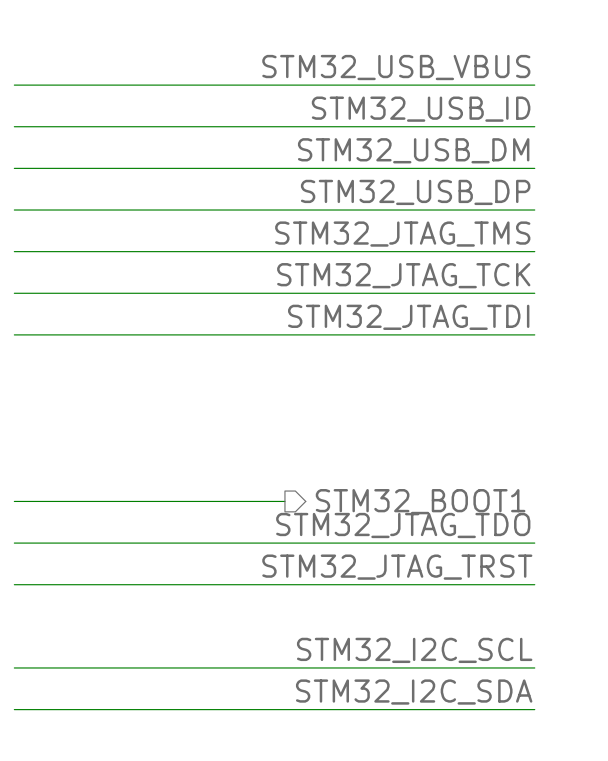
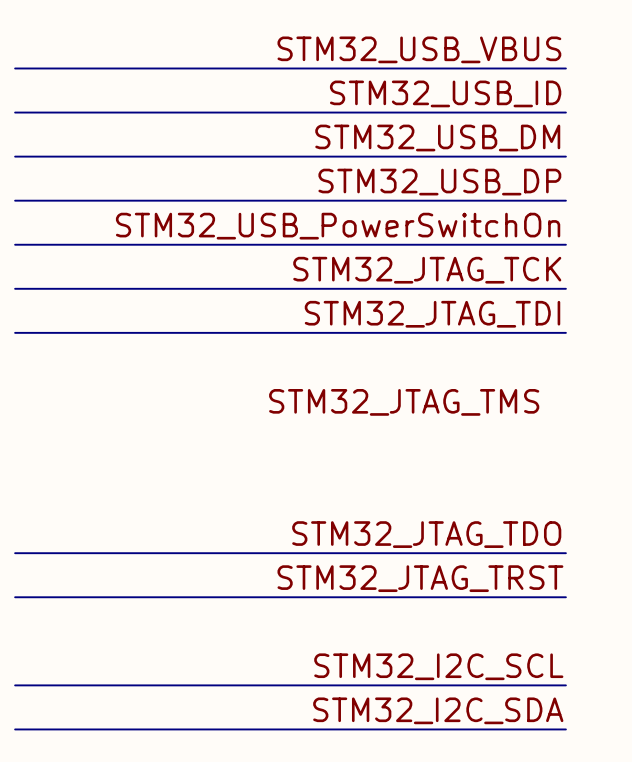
label: STM32_JTAG_TMS (402, 234) -> STM32_USB_PowerSwitchOn (338, 226)
label: none -> STM32_JTAG_TMS (404, 402)
wire: (14, 501) (284, 501) -> none
hierarchical label: STM32_BOOT1 (420, 501) -> none

